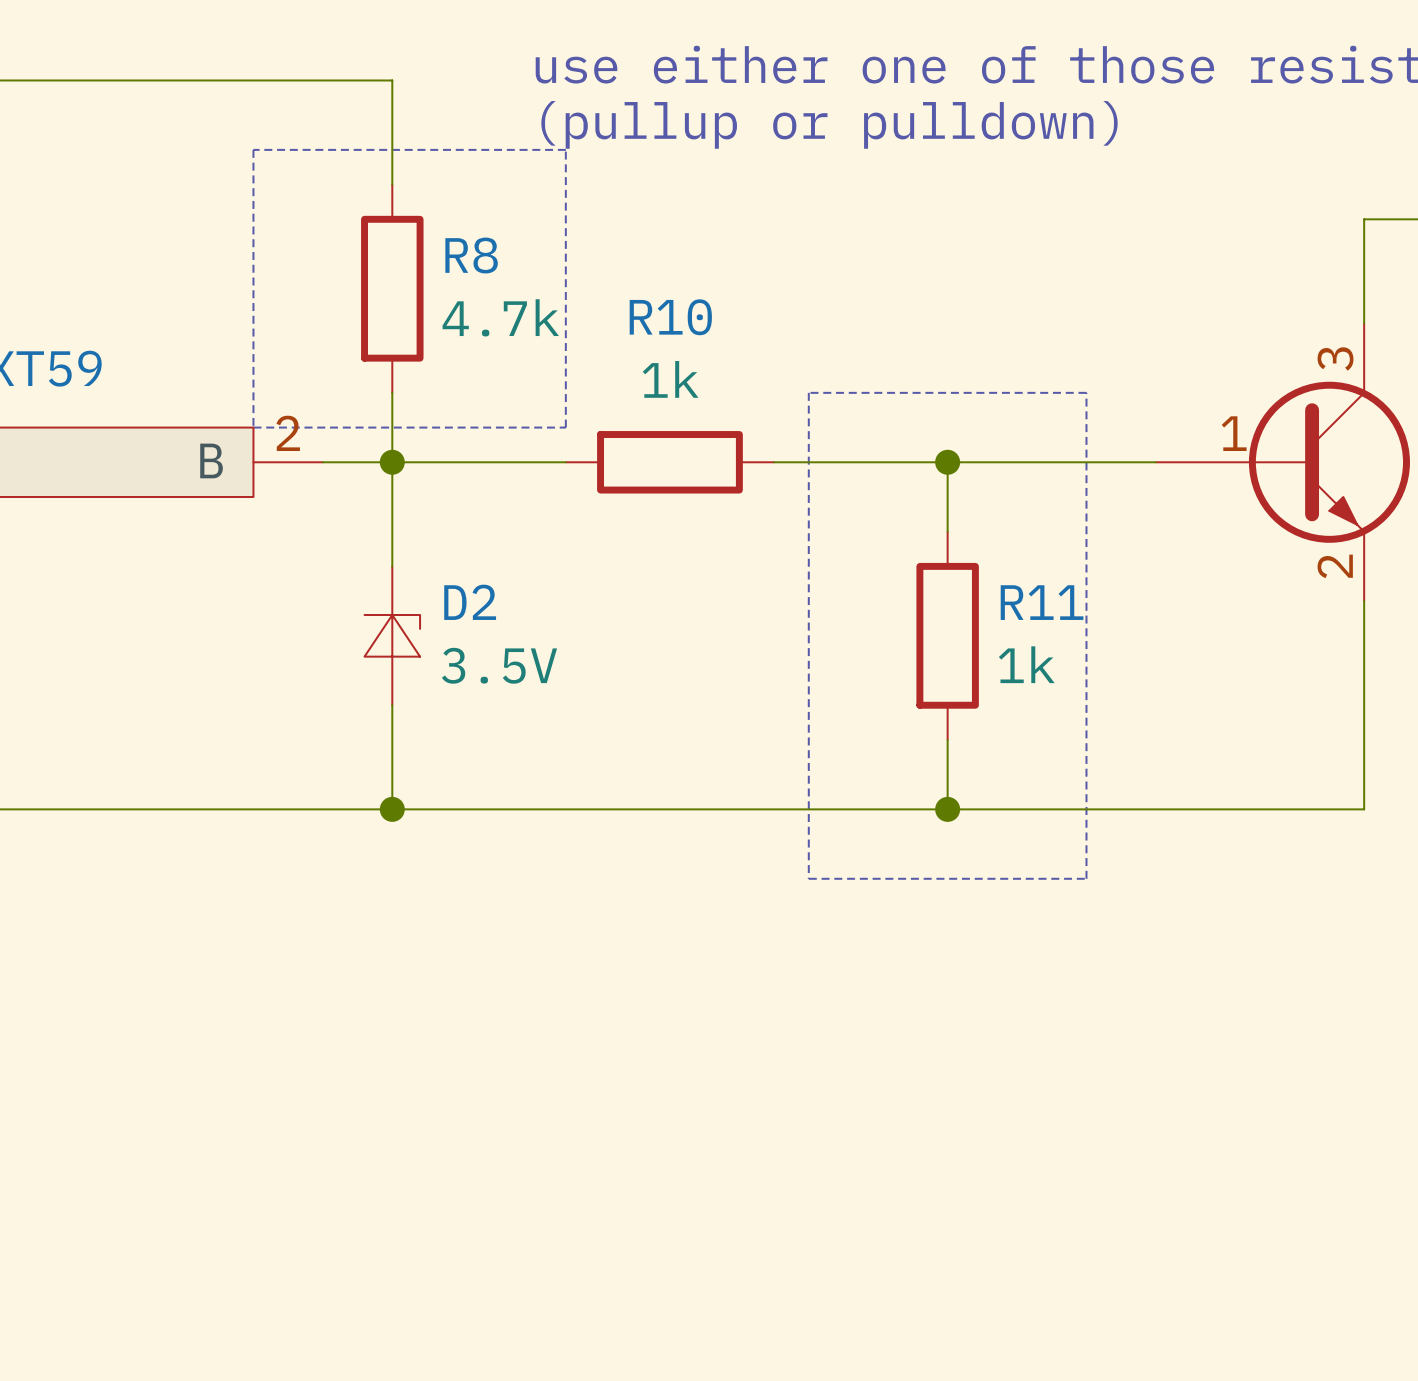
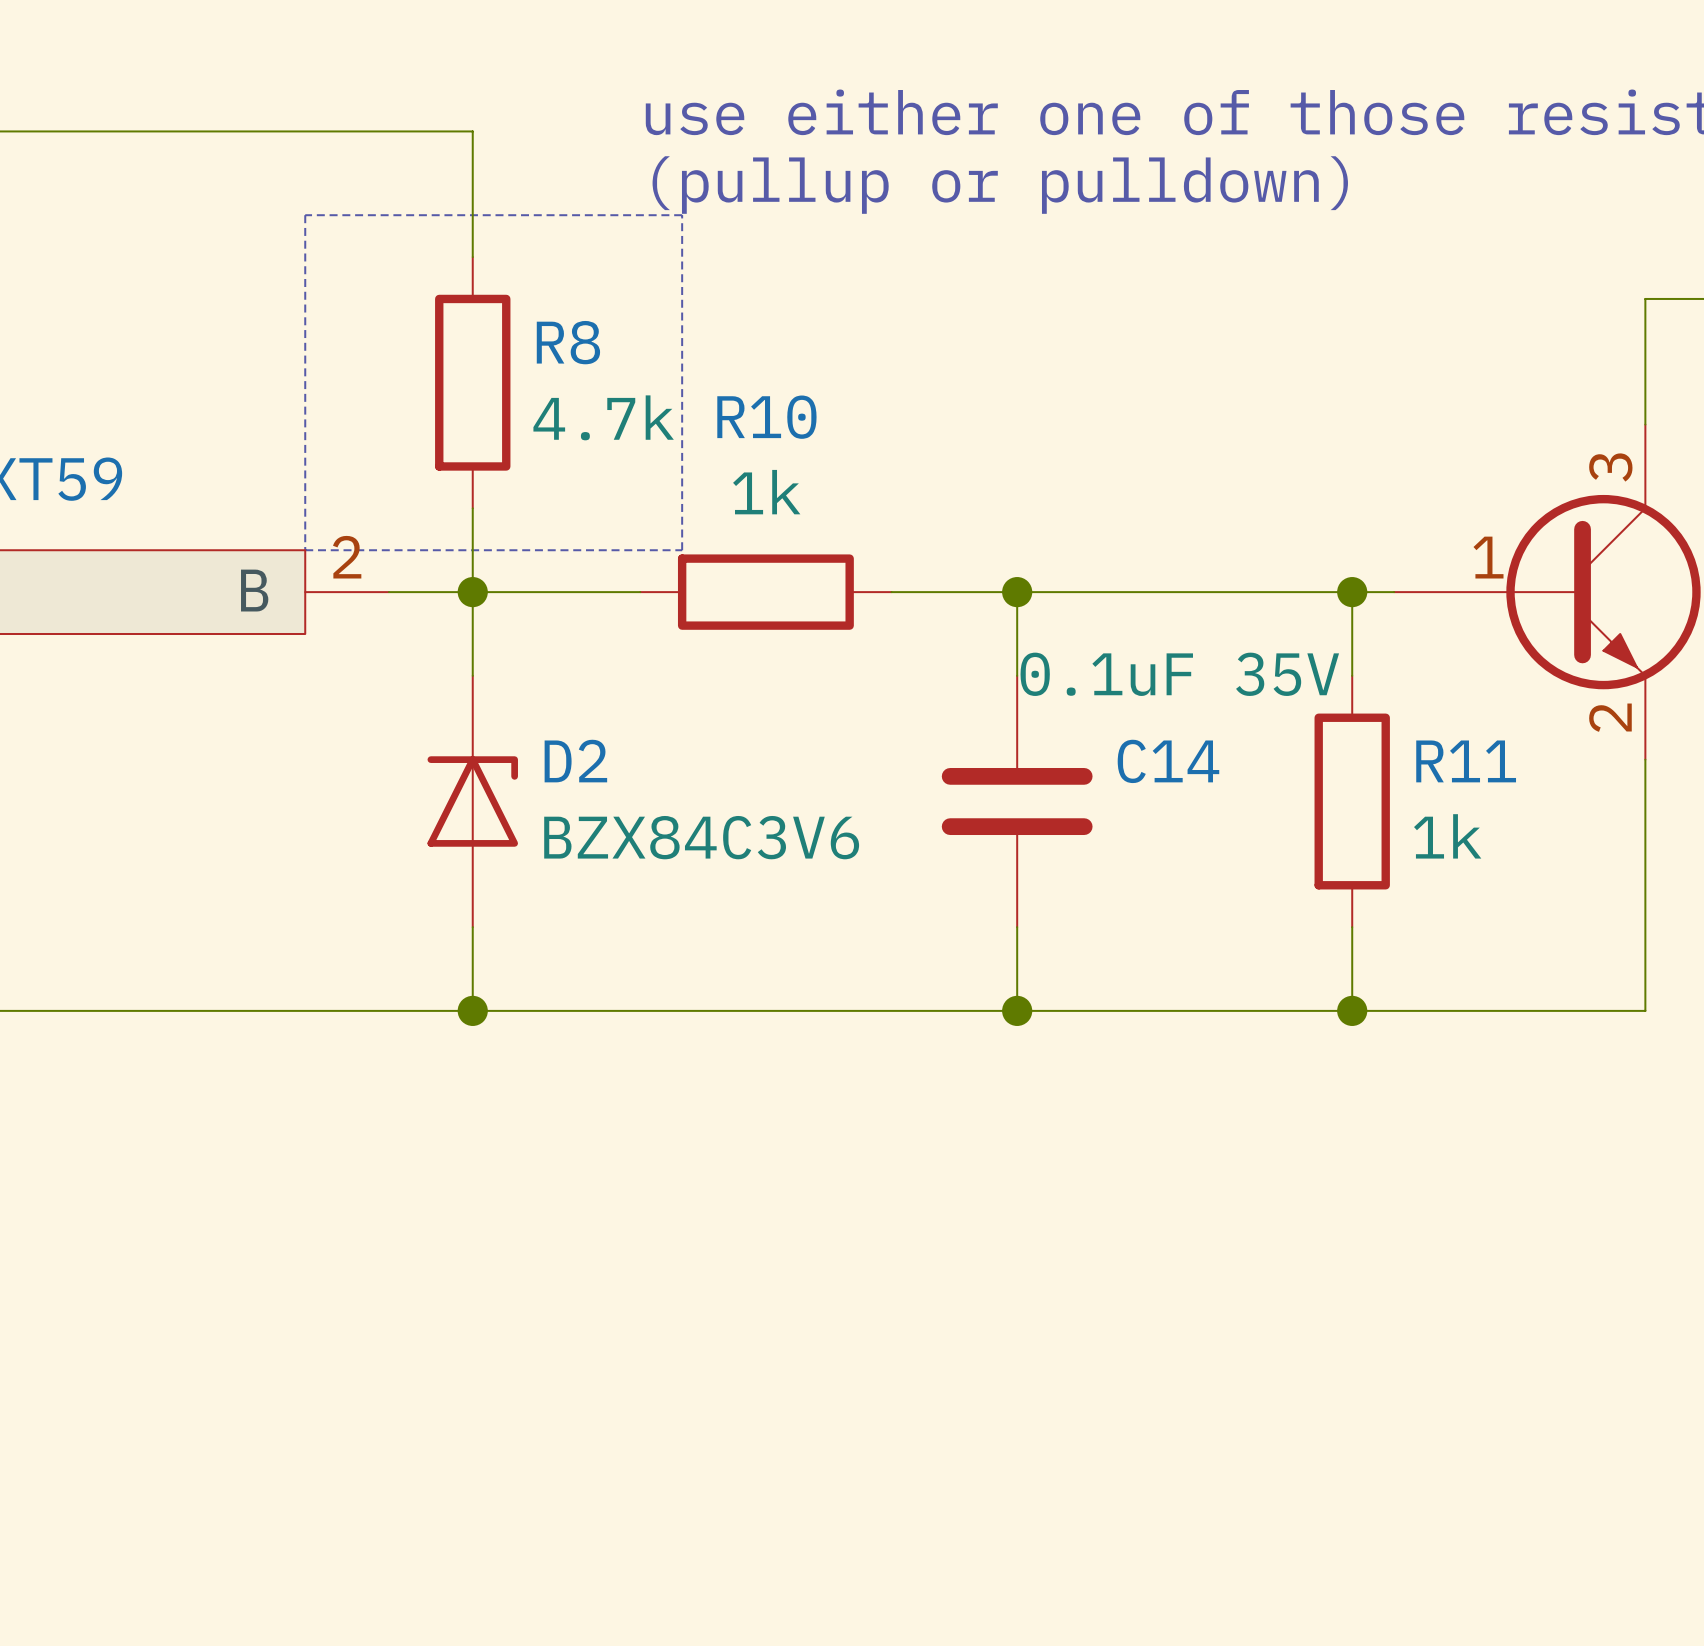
line: (808, 392) (1086, 392) (1086, 878) (808, 878) (808, 392) -> none
R10 position: (669, 462) -> (765, 592)
junction: none -> (1017, 592)
wire: (947, 462) (947, 531) -> (1017, 592) (1017, 675)
junction: (947, 462) -> none
wire: none -> (1352, 592) (1352, 675)
junction: none -> (1352, 592)
D2 symbol: [364, 566, 421, 706] -> [427, 675, 518, 928]
C14: none -> 0.1uF 35V (1017, 801)
R11 position: (947, 635) -> (1352, 801)
D2 value: 3.5V (499, 665) -> BZX84C3V6 (701, 837)
wire: (947, 739) (947, 809) -> (1017, 927) (1017, 1010)
wire: none -> (1352, 927) (1352, 1010)
junction: none -> (1017, 1010)
junction: (947, 809) -> none
junction: none -> (1352, 1010)

